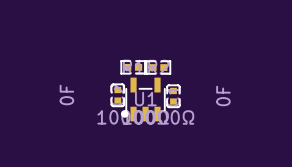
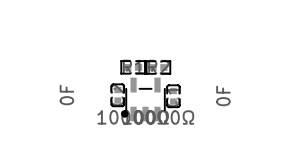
U1 name: U1 (145, 99) -> none

